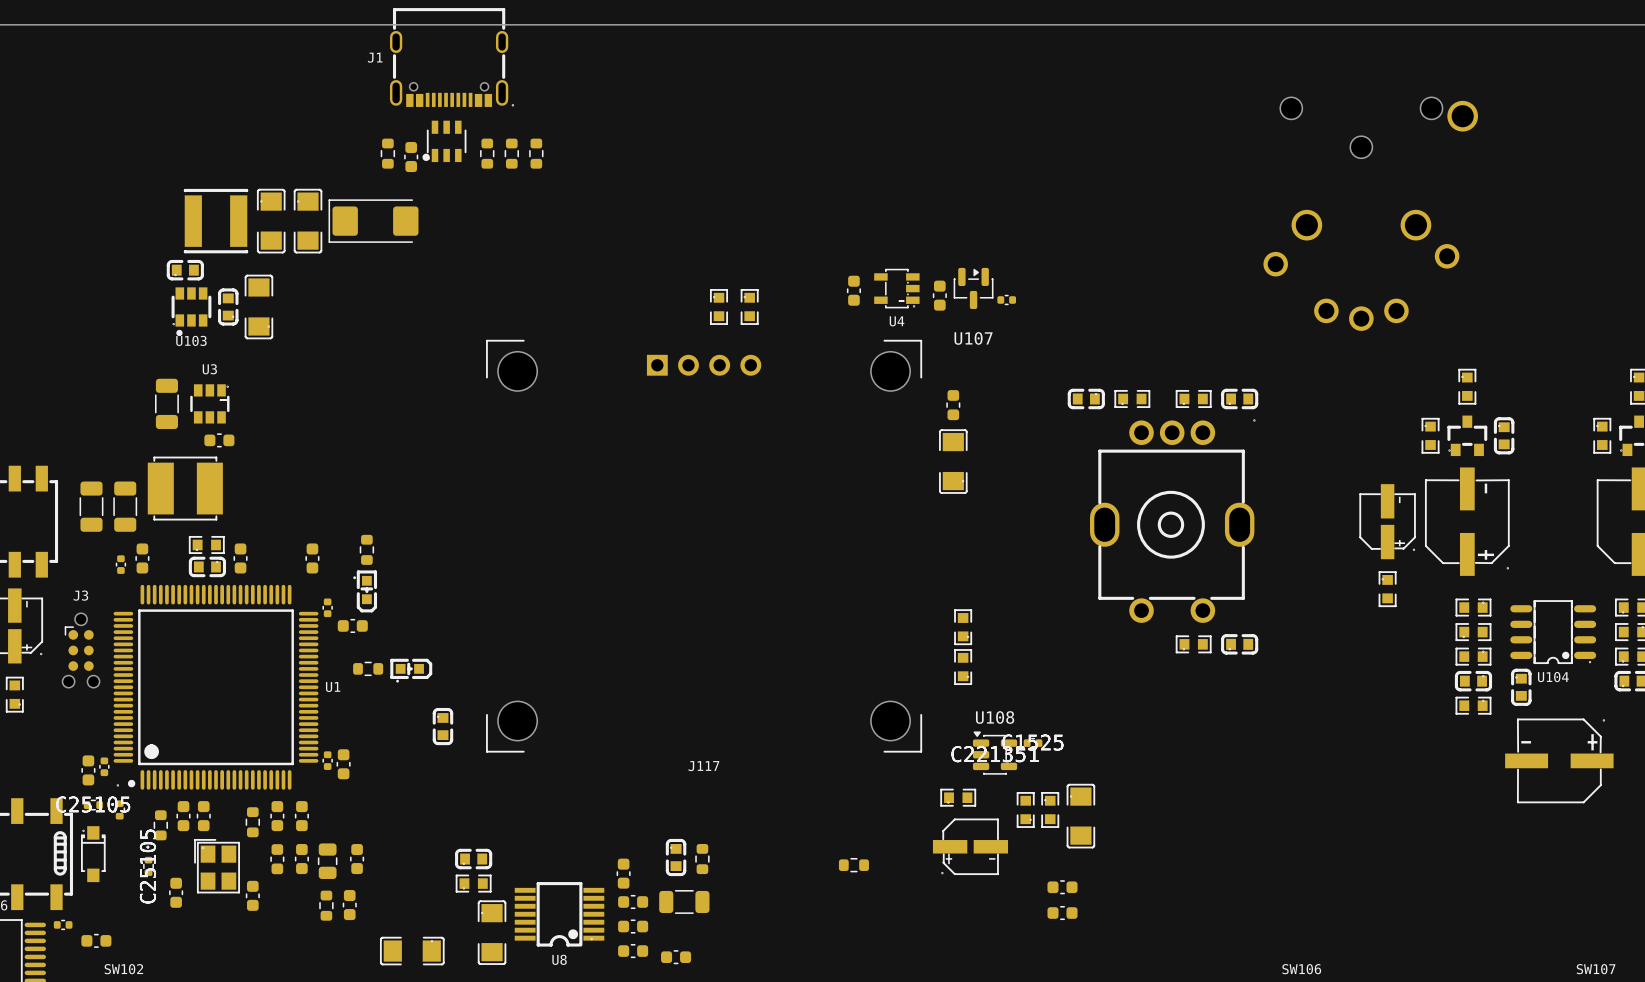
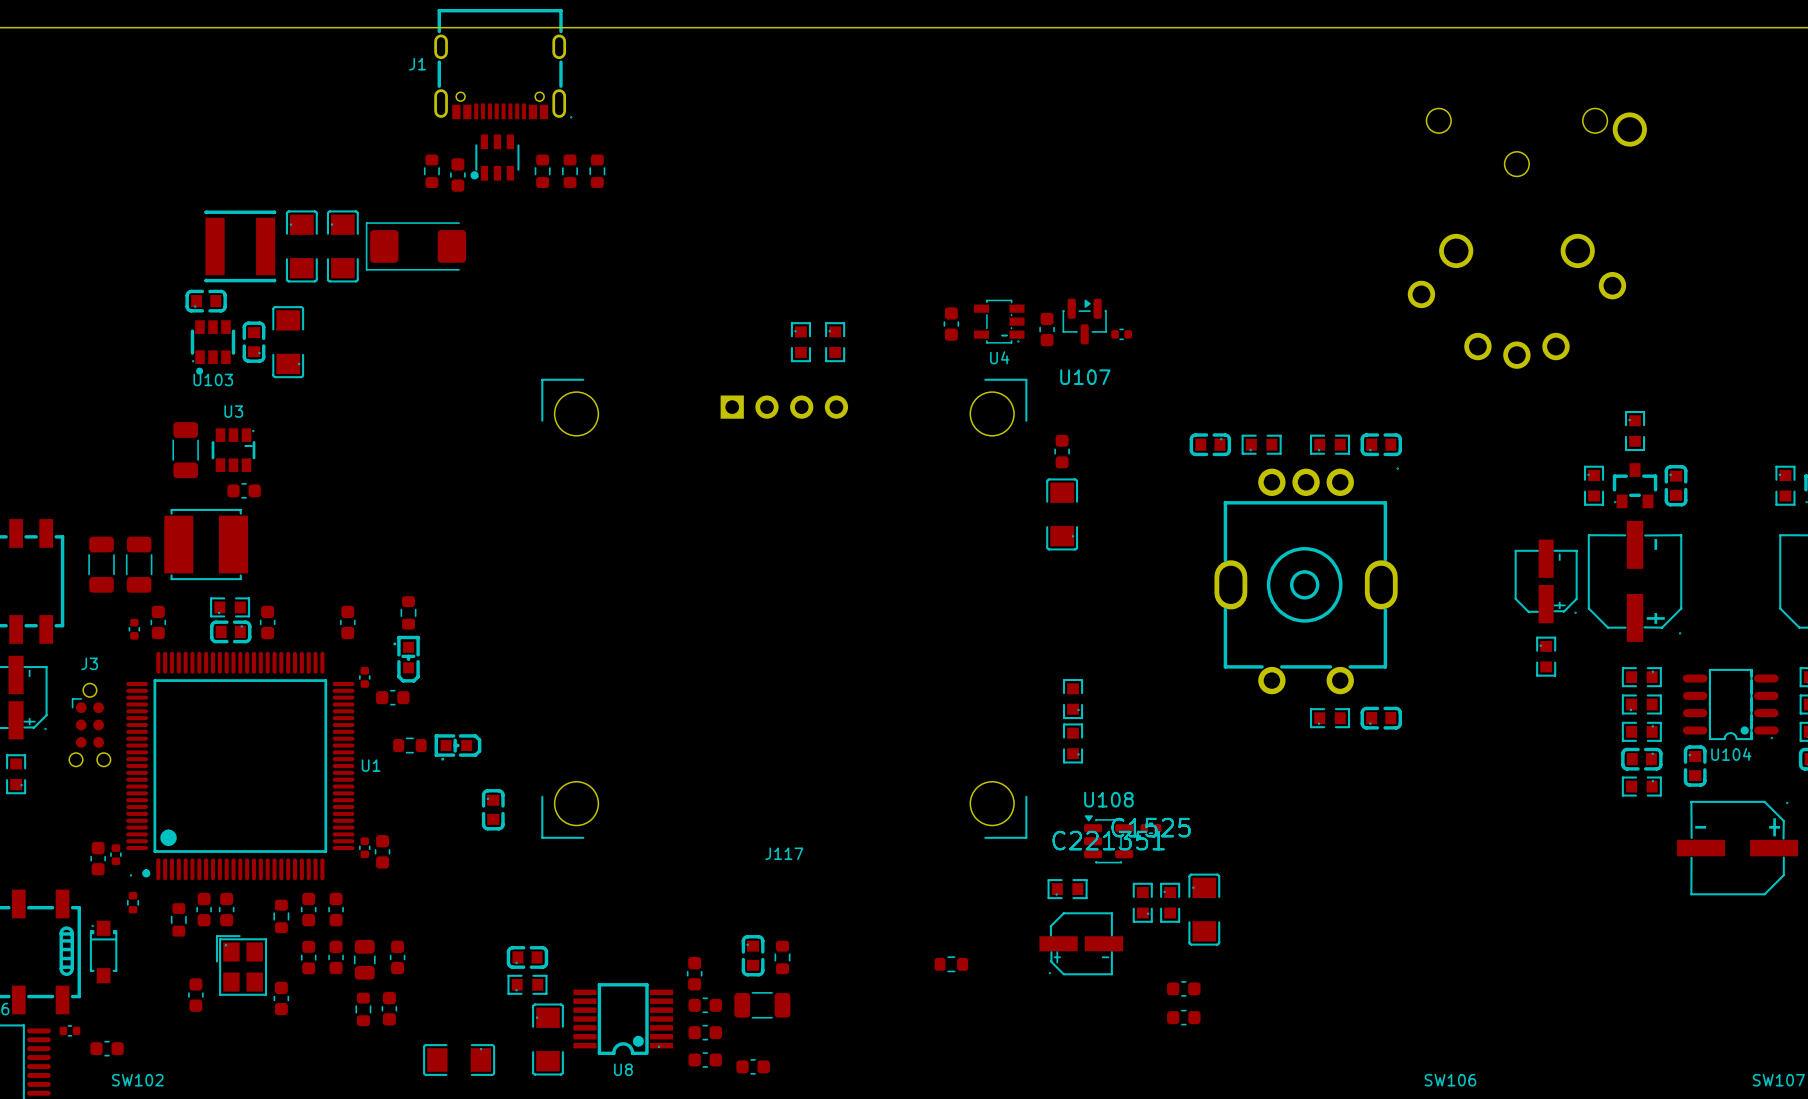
part: (93, 805) -> none
part: (148, 866) -> none

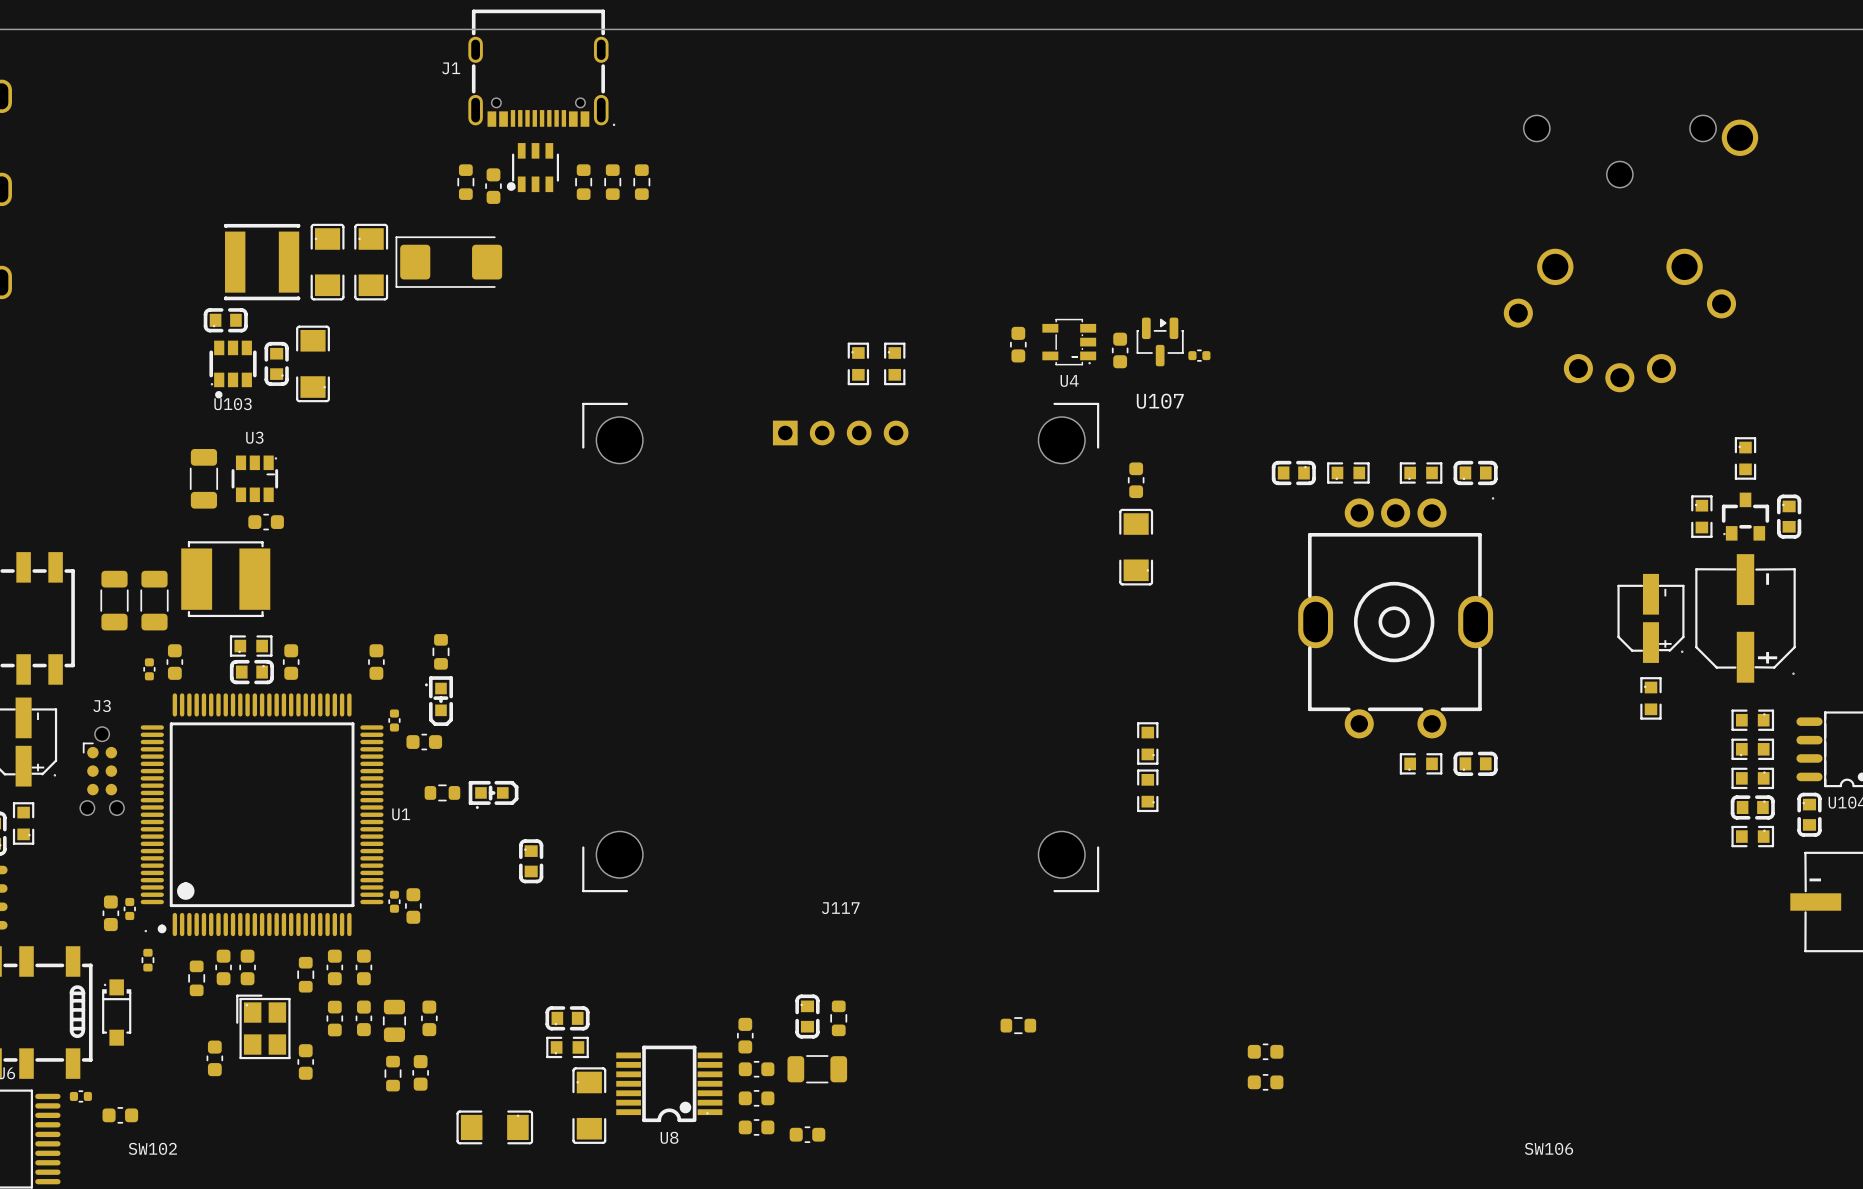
part: (1150, 828) -> none
U108: (1108, 839) -> none
part: (1067, 889) -> none
part: (1142, 902) -> none
part: (1170, 902) -> none
part: (1204, 909) -> none
part: (1081, 943) -> none

